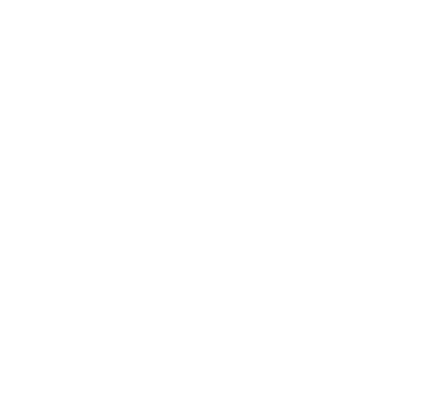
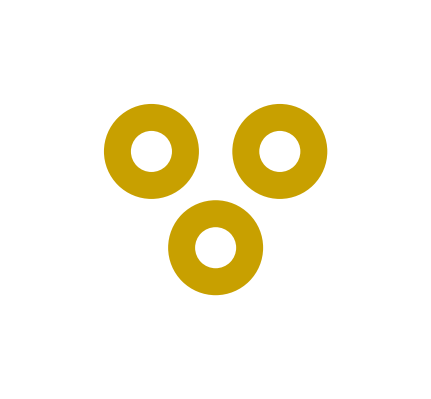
part: none -> (215, 199)

